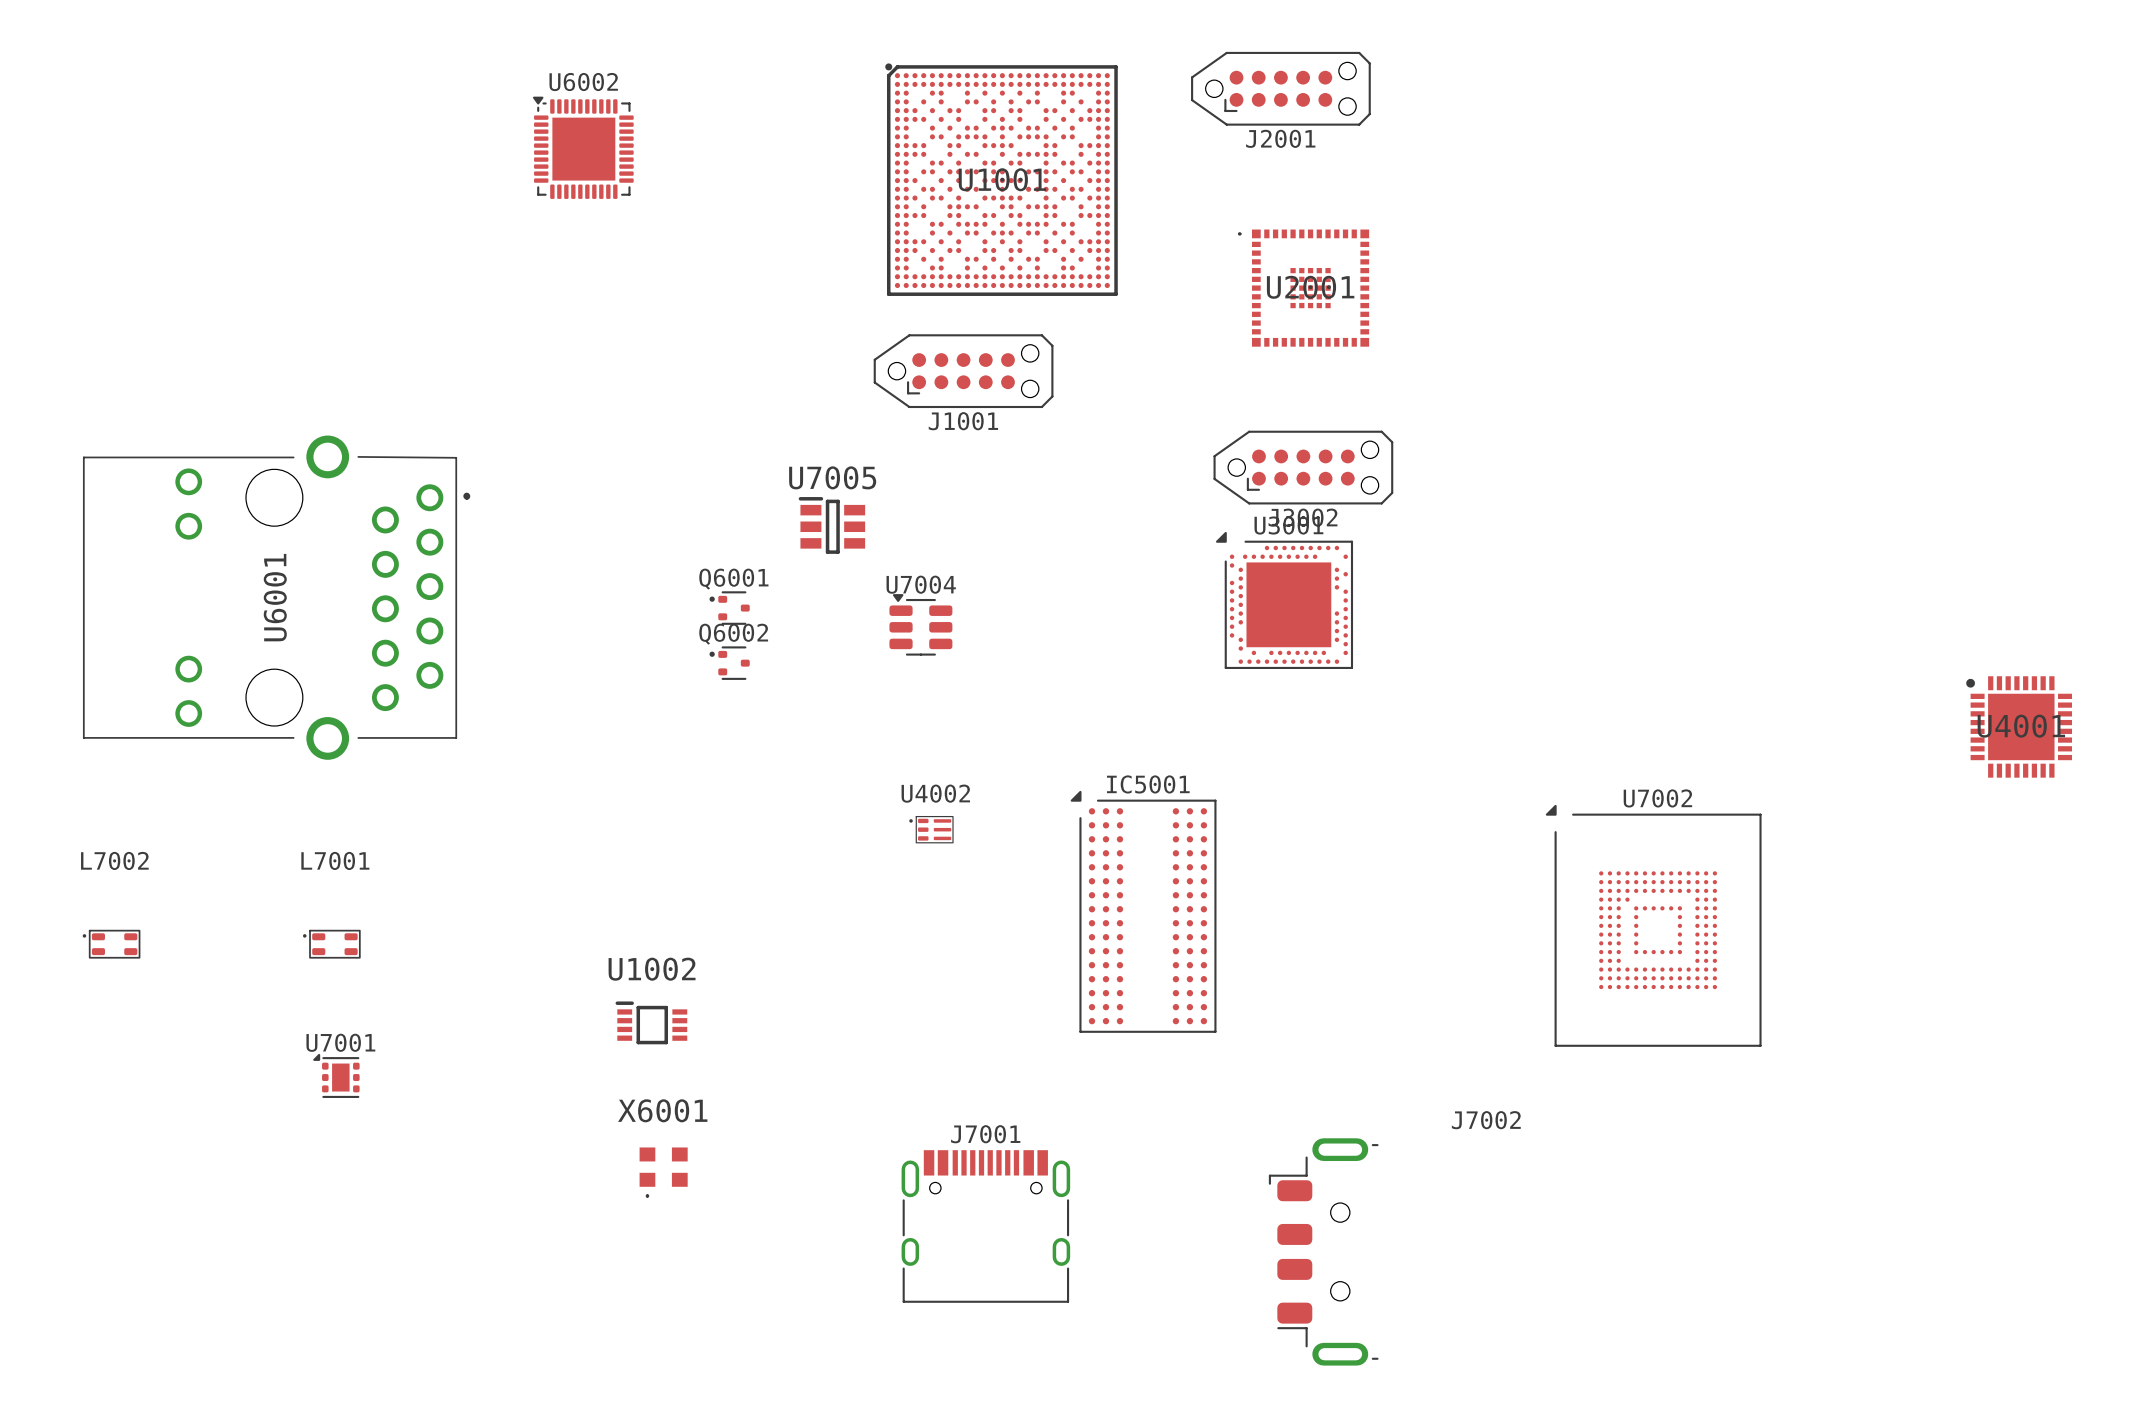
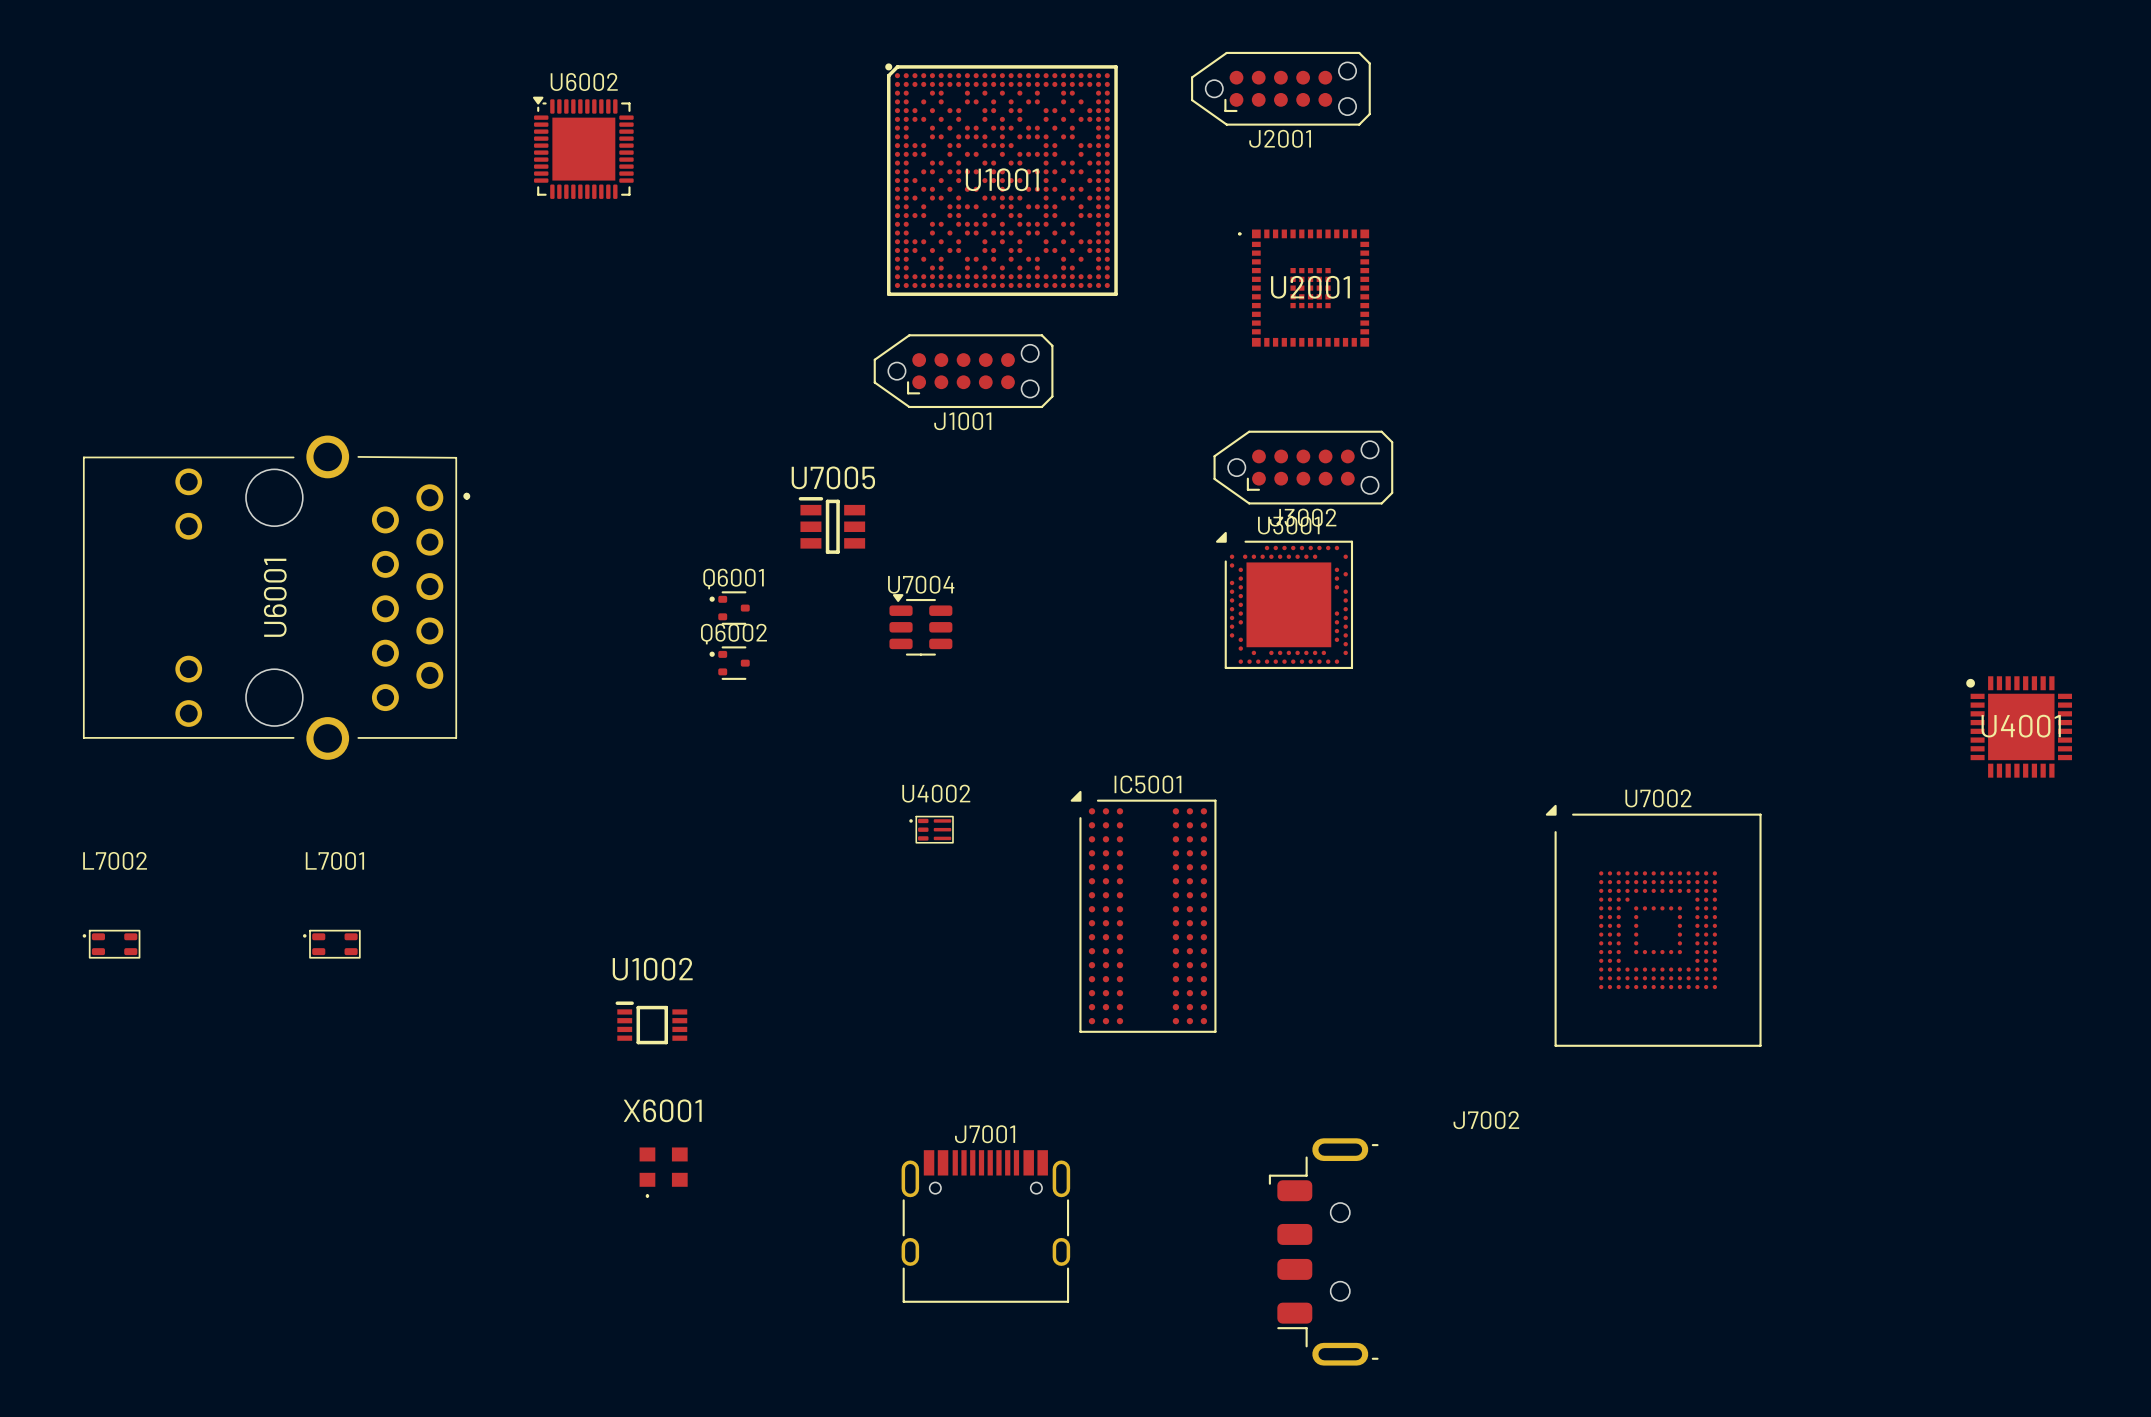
U7001: (336, 1075) -> none

